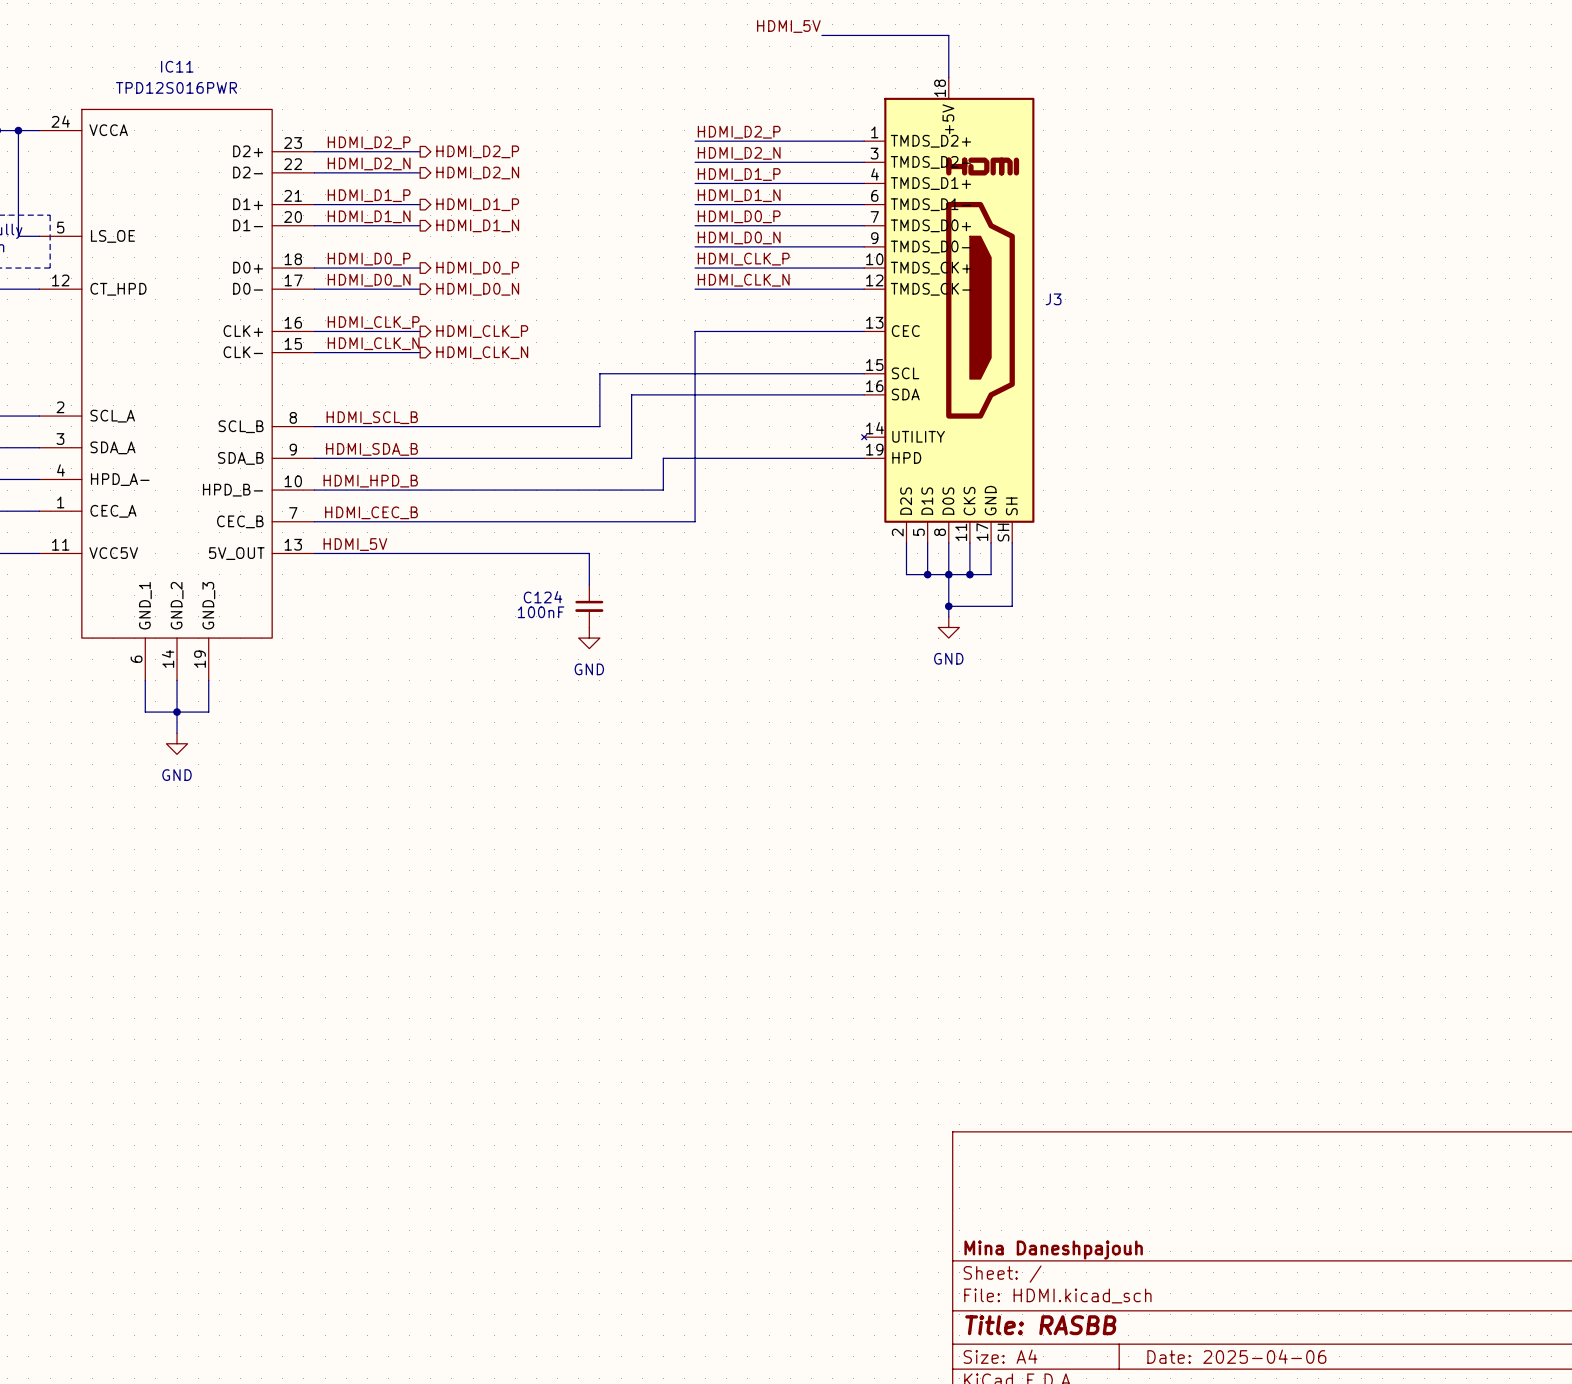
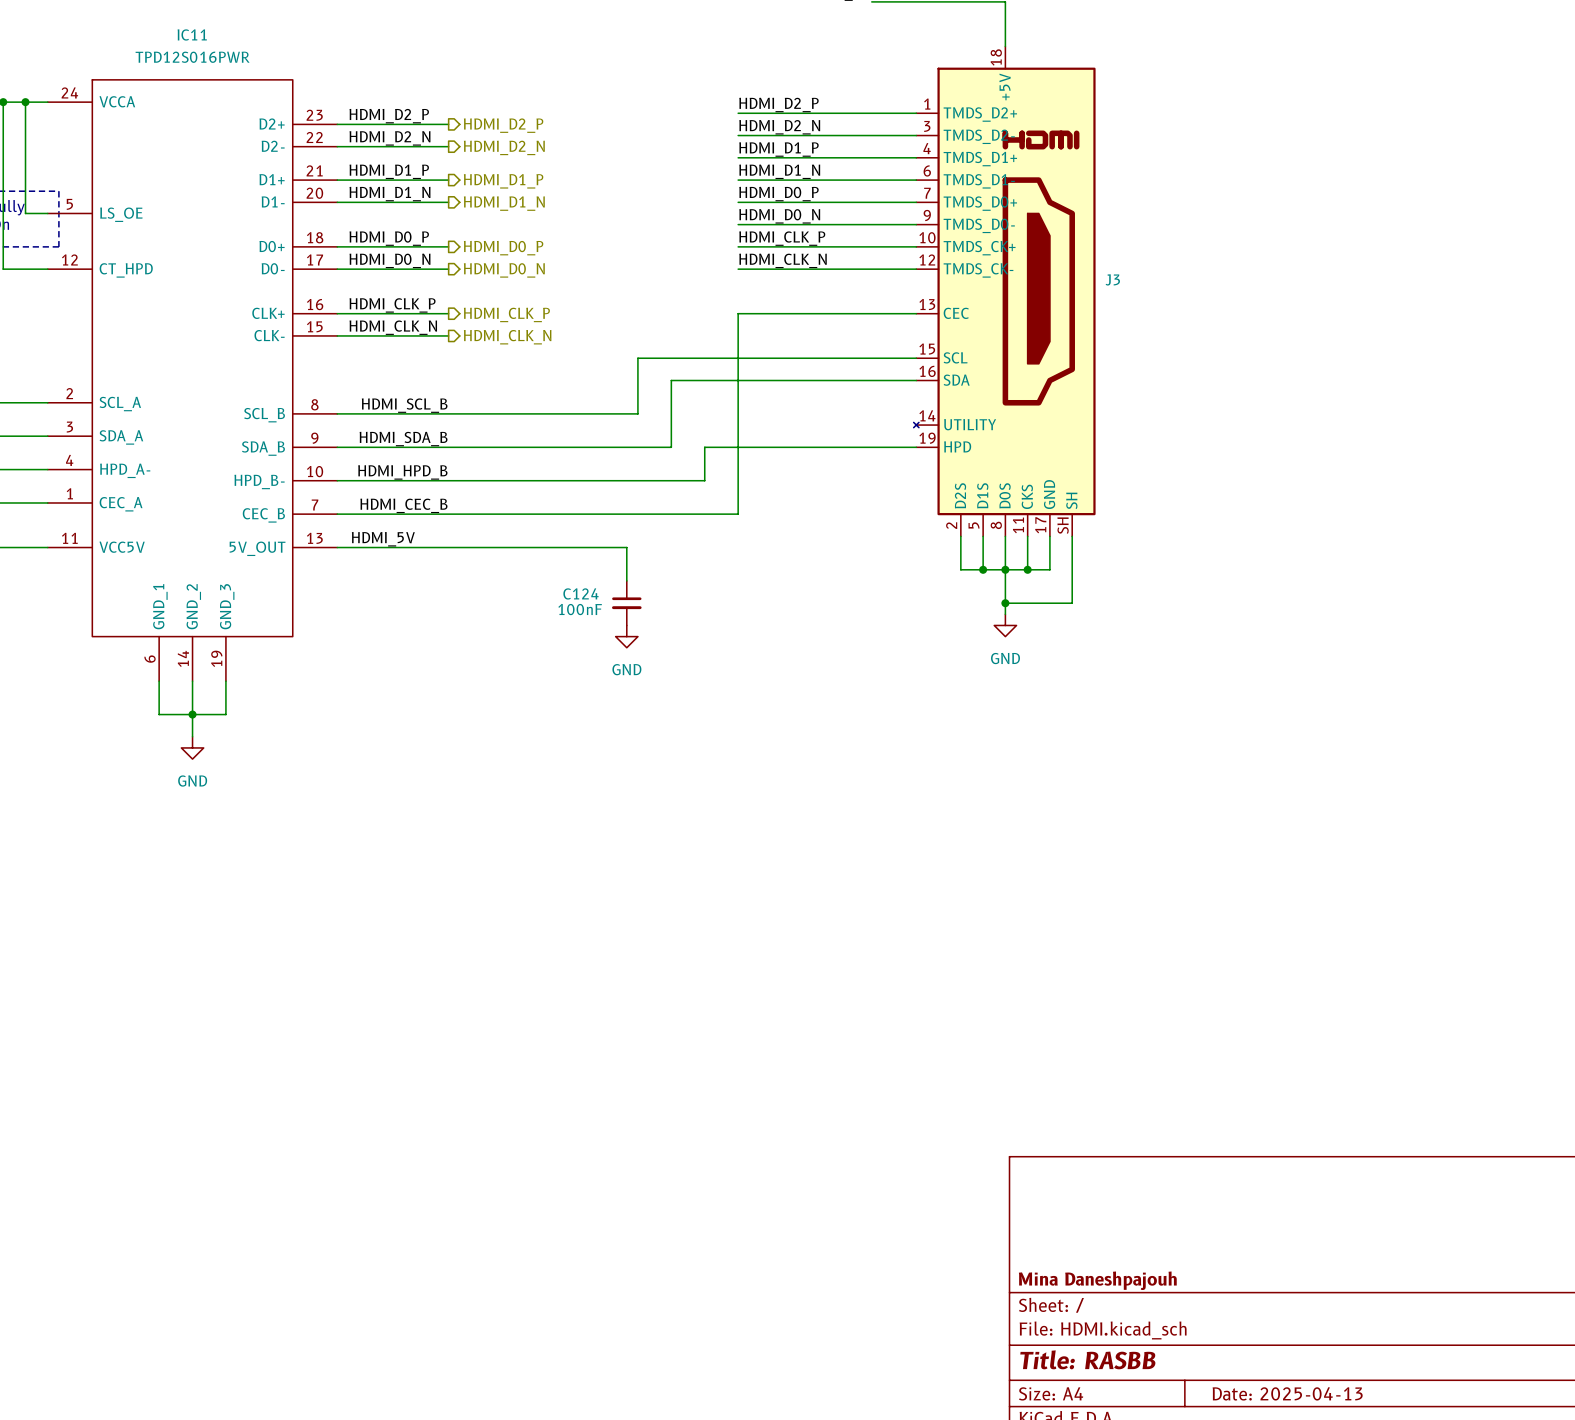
title block: Date: 2025-04-06 (1236, 1356) -> Date: 2025-04-13 (1287, 1393)

